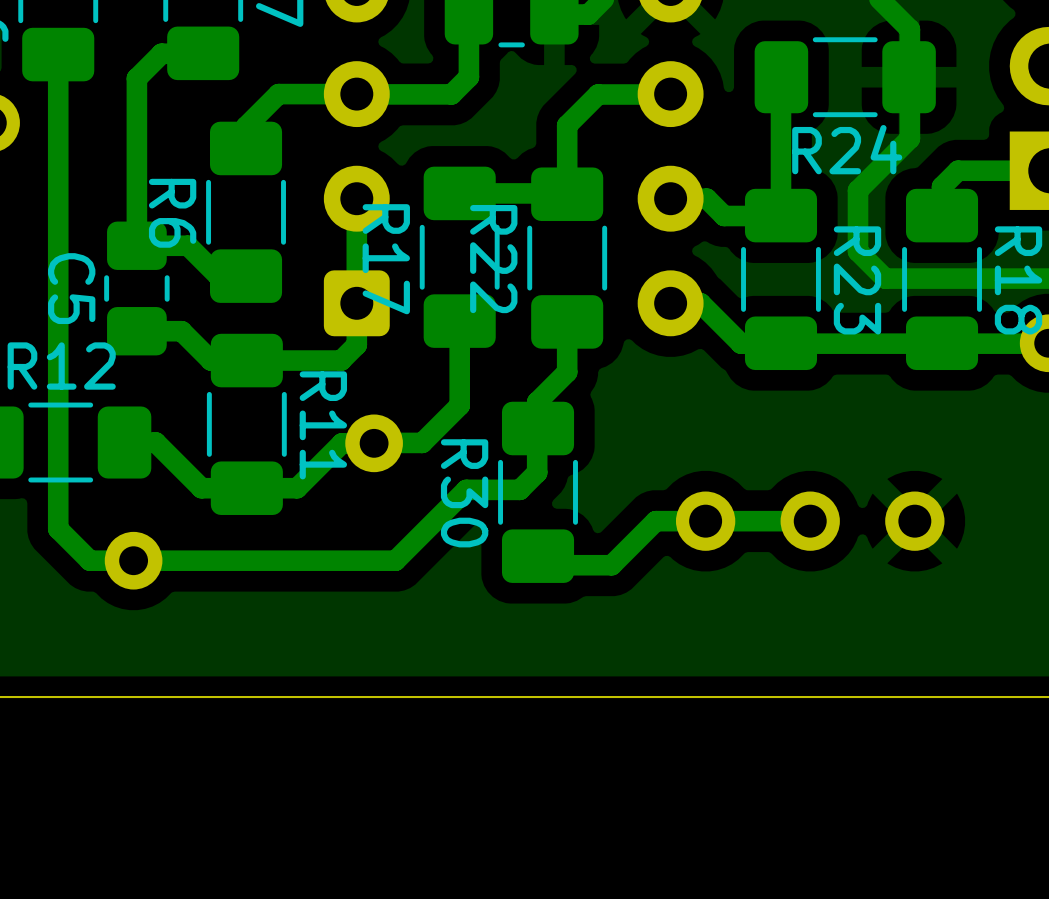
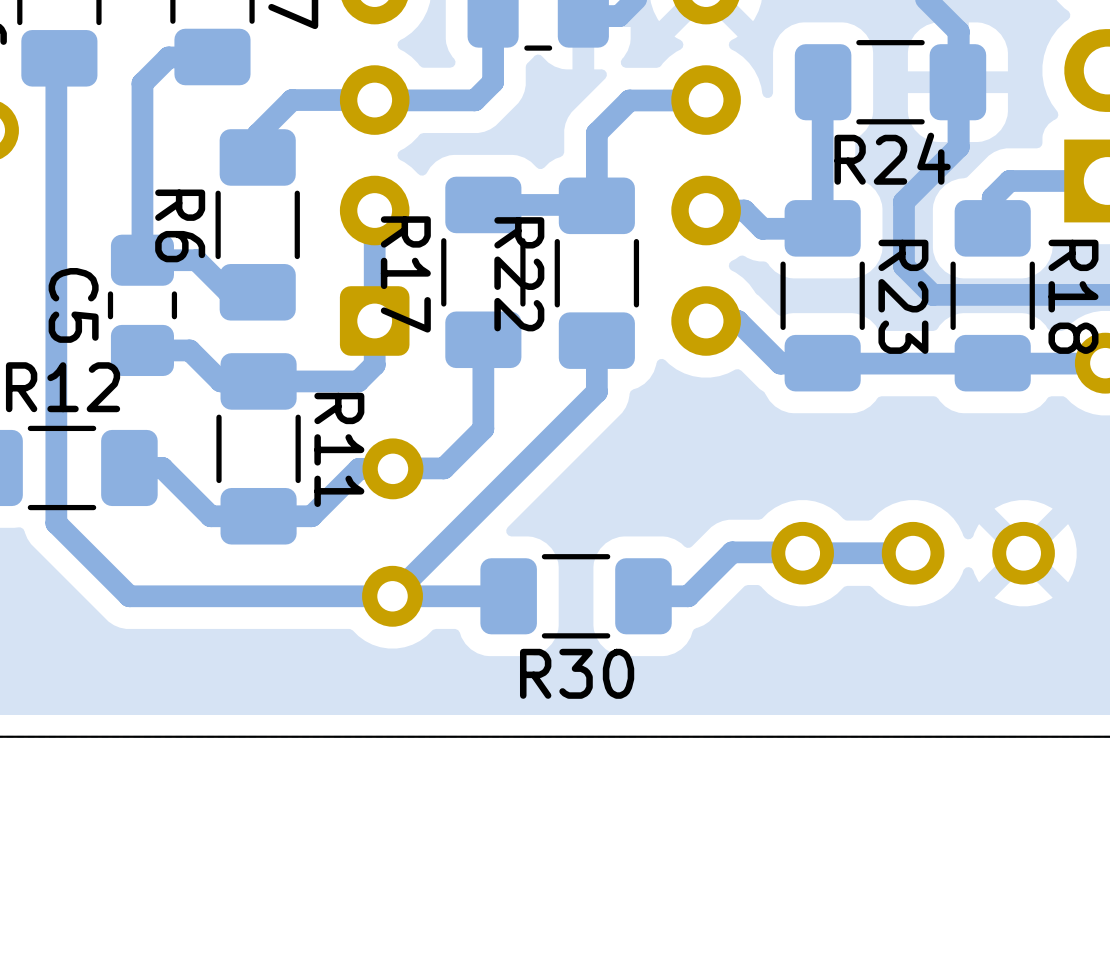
track: (58, 54) (58, 528) (89, 560) (395, 560) (466, 489) (519, 489) (537, 472) (537, 402) (567, 370) -> (392, 596) (596, 391)
track: none -> (56, 61) (56, 523) (129, 596) (508, 596)
R30 rotation: 0° (538, 492) -> 90° clockwise (576, 596)
R30 name position: R30 (464, 493) -> R30 (577, 673)
track: (810, 521) (655, 521) (611, 565) (547, 565) (538, 556) -> none
part position: (810, 521) -> (913, 553)
track: none -> (913, 553) (732, 552) (688, 596) (643, 596)
part position: (133, 560) -> (392, 596)

